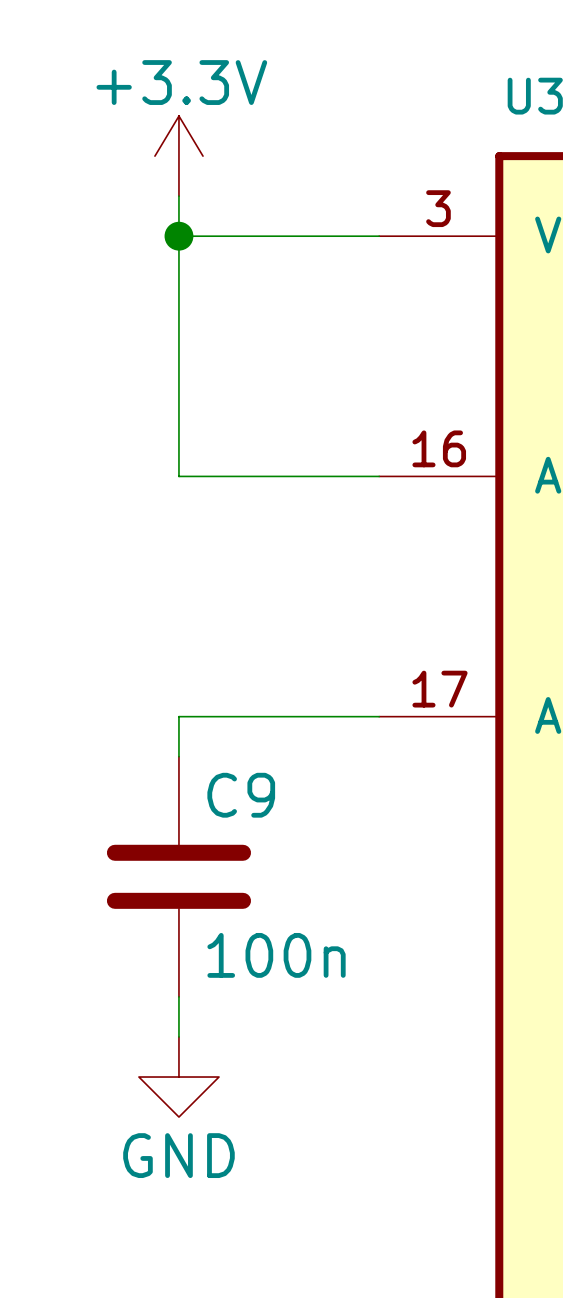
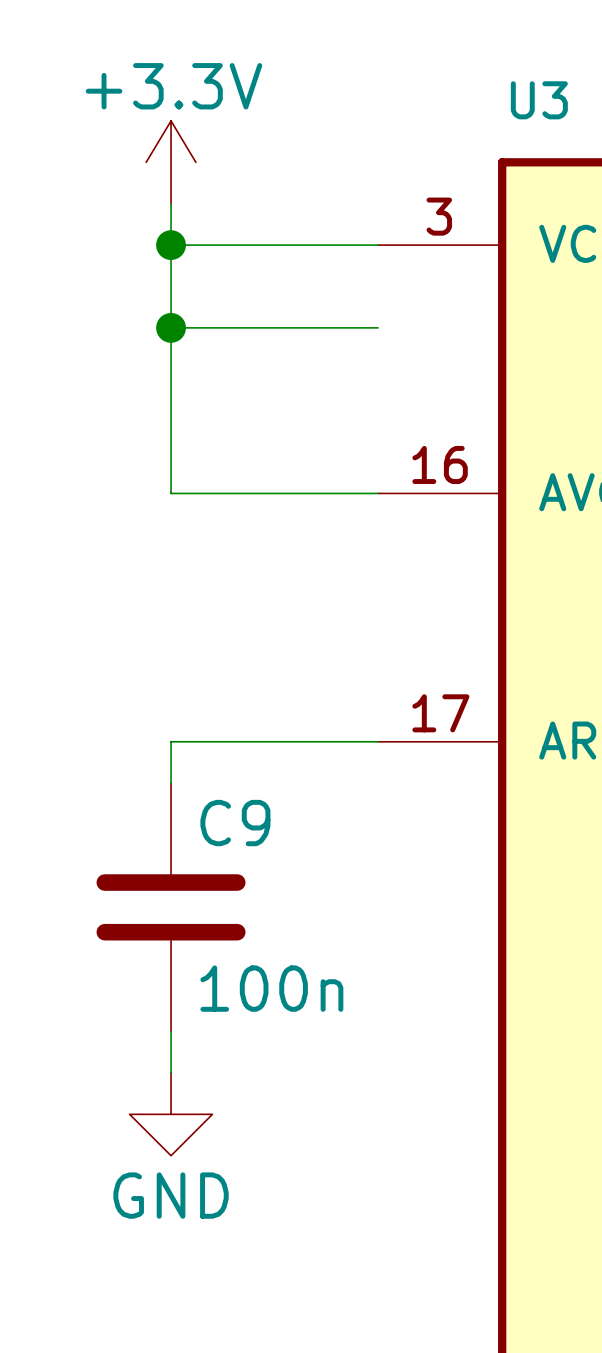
wire: none -> (171, 327) (378, 327)
junction: none -> (171, 327)

